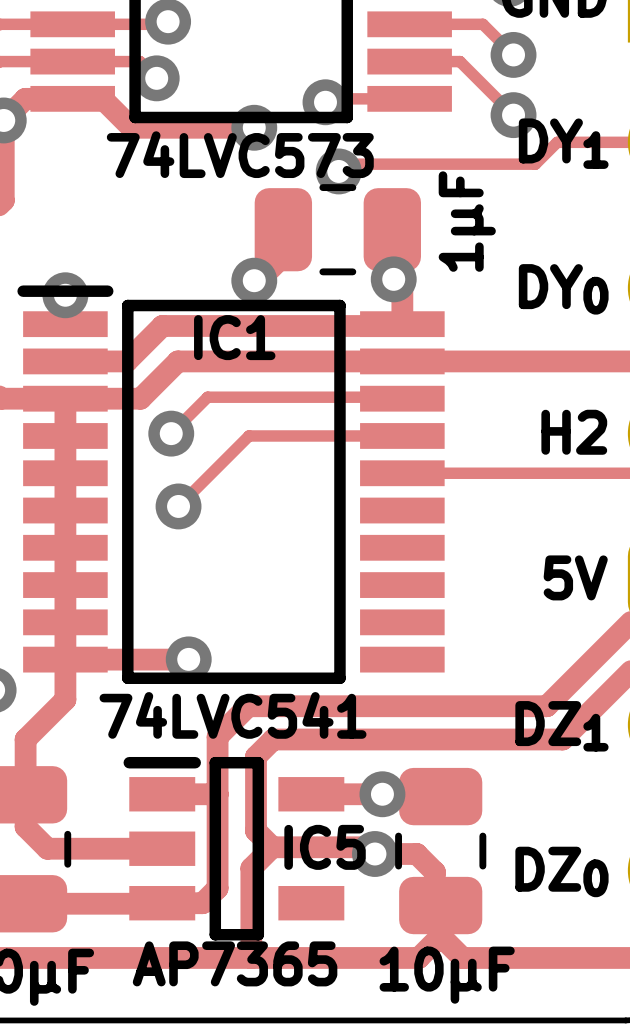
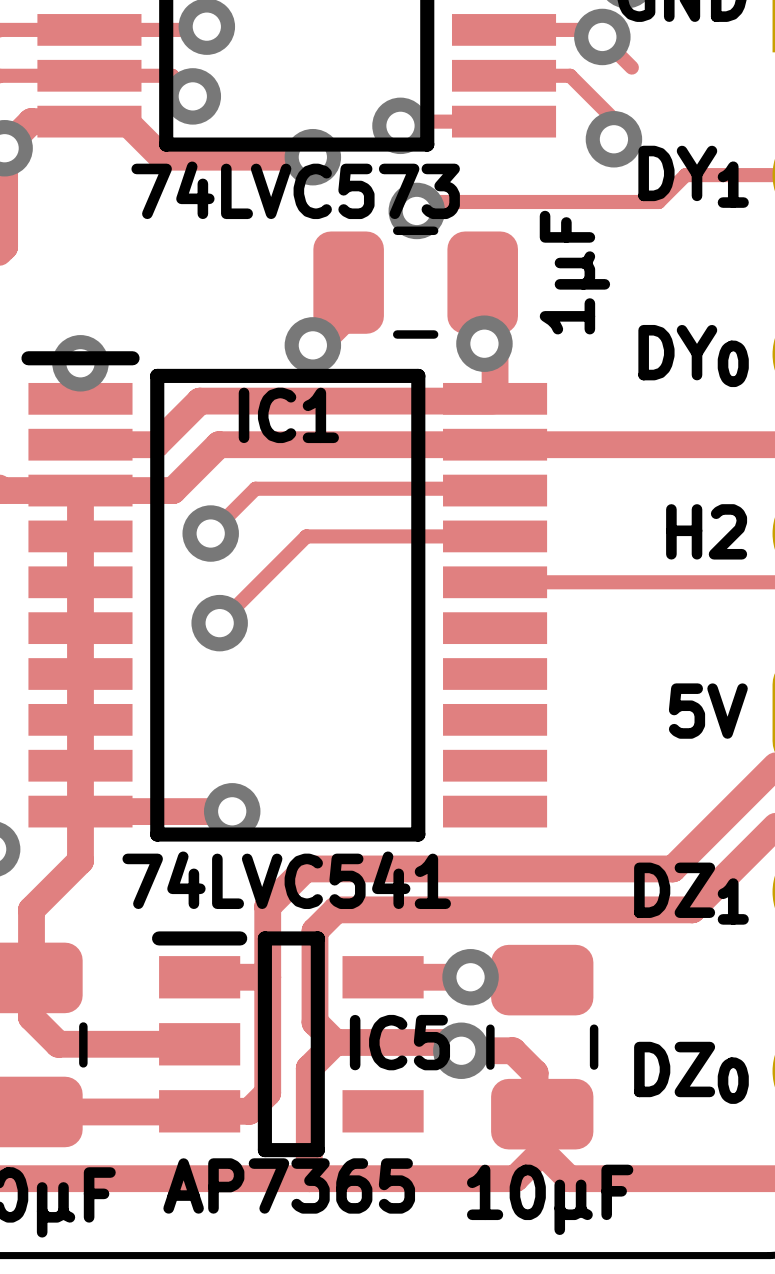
via position: (513, 54) -> (602, 36)
track: (459, 61) (513, 115) -> (565, 75) (570, 75) (613, 119) (613, 139)
via position: (513, 115) -> (613, 139)

